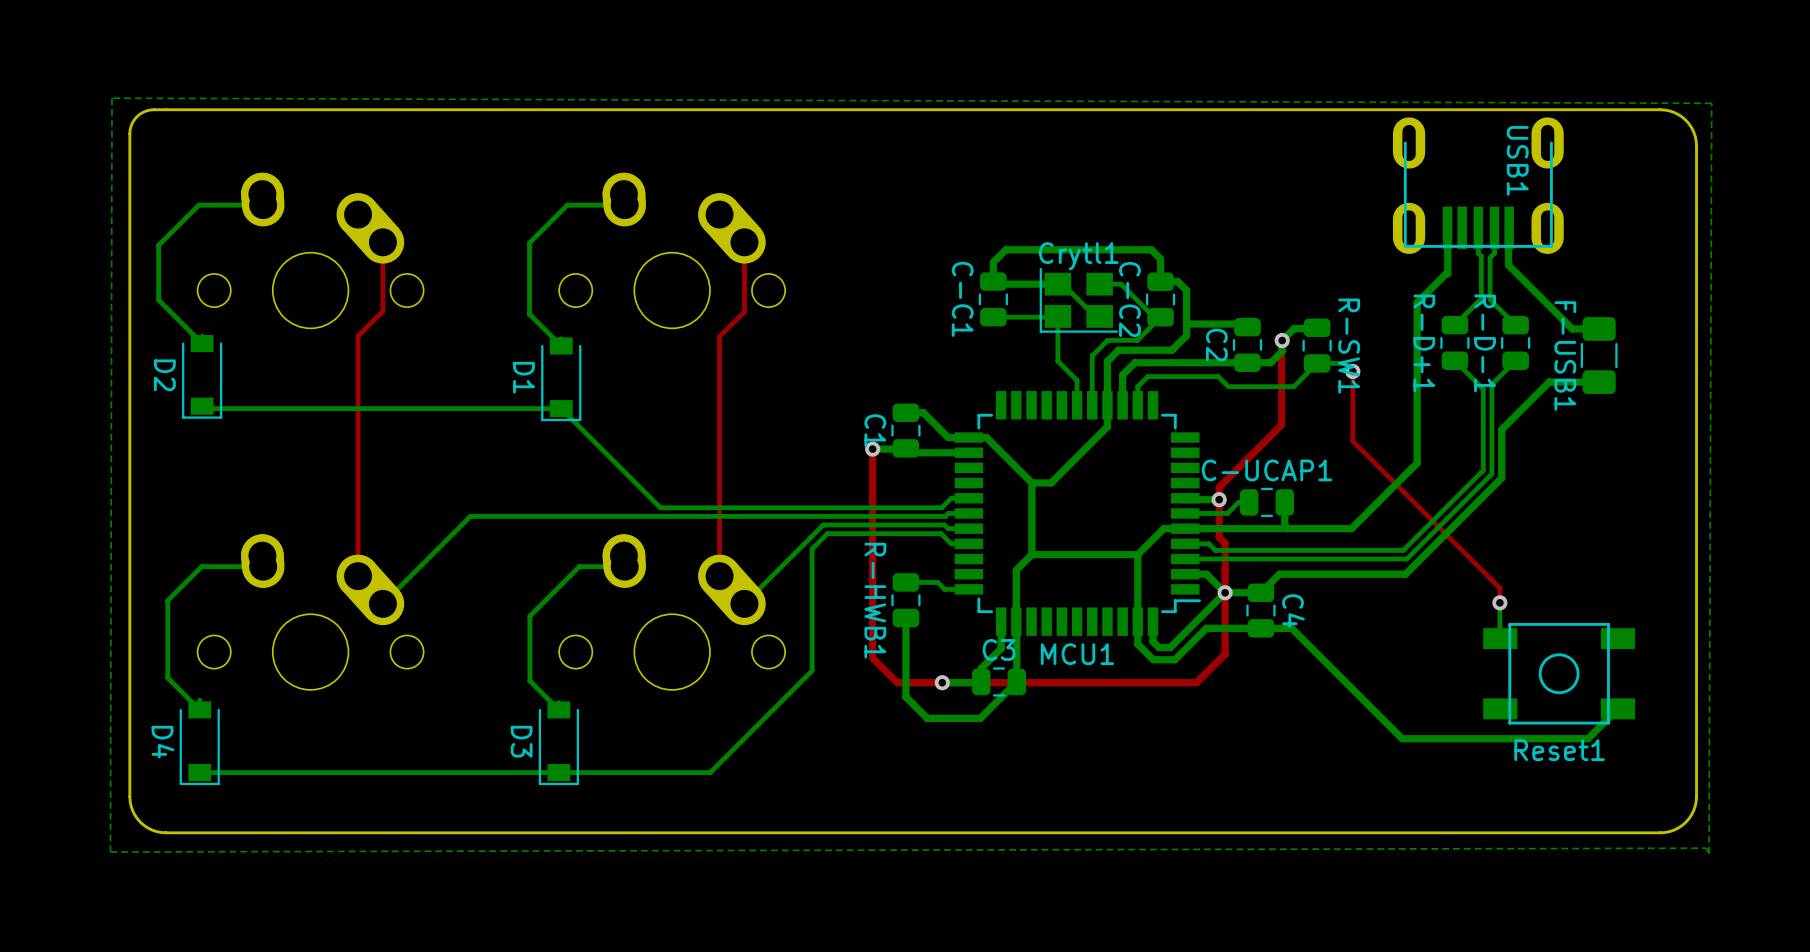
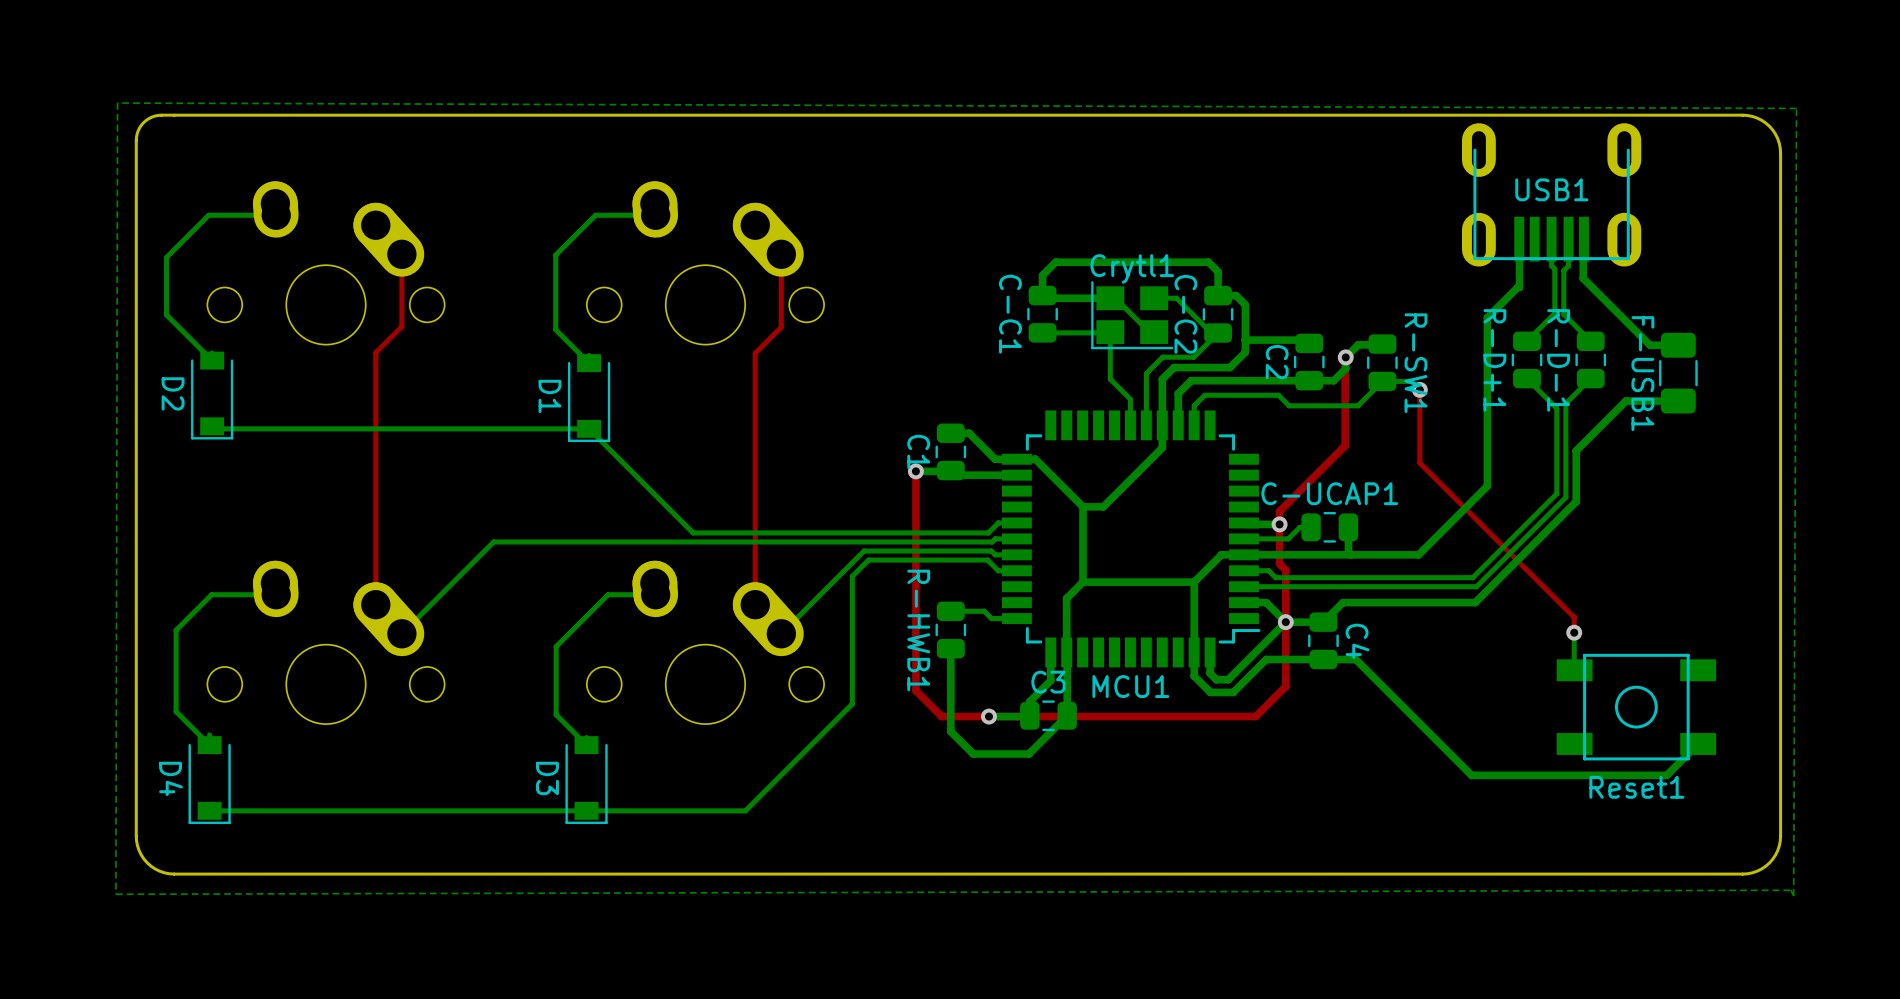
USB1 name rotation: 0° (1517, 160) -> 90° counterclockwise (1551, 189)

